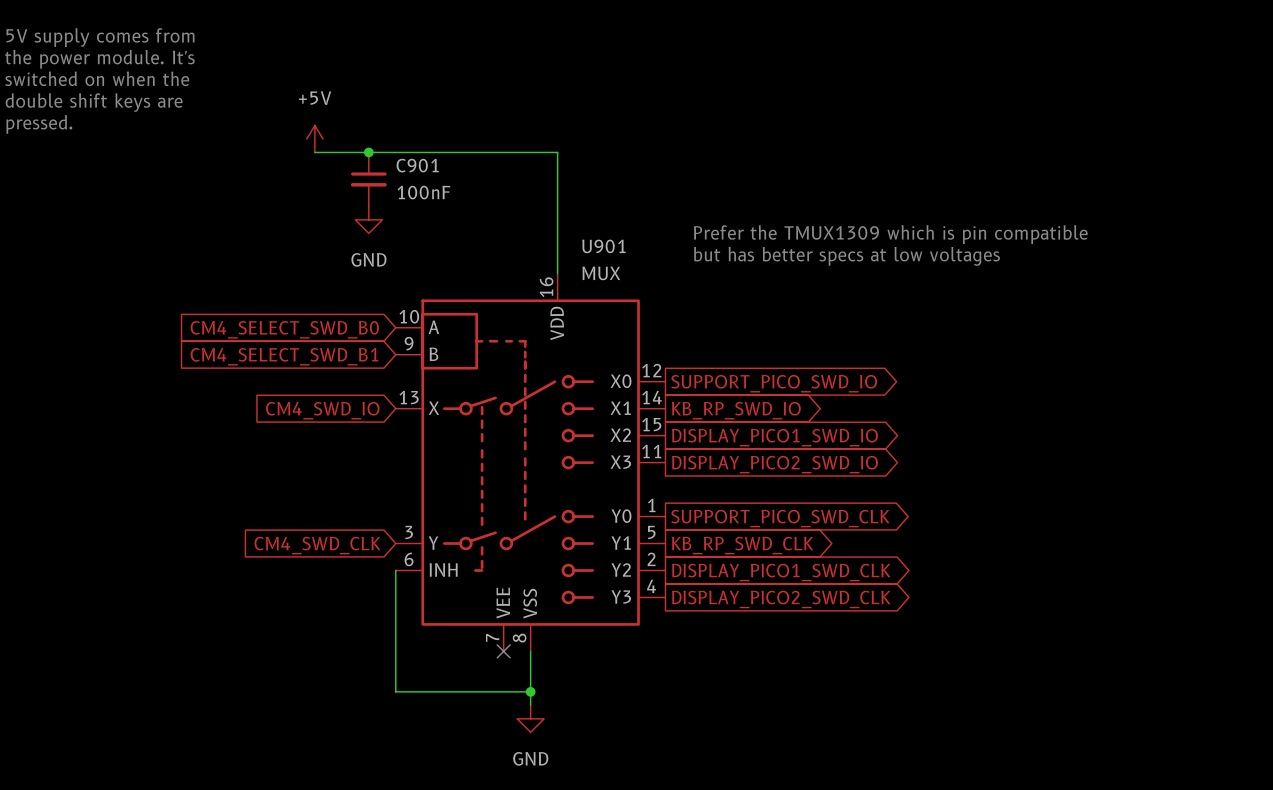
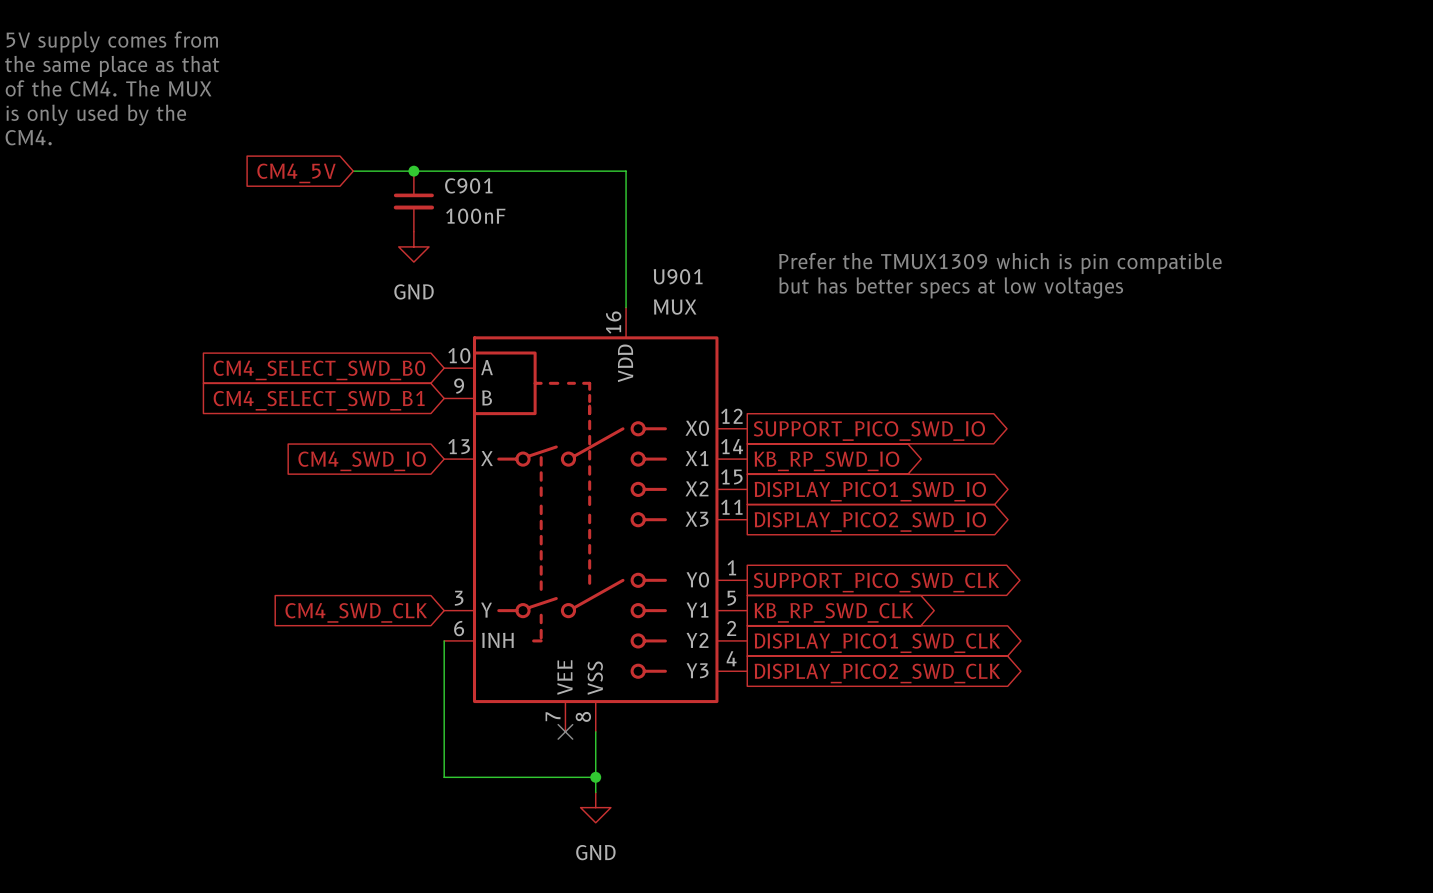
text: the power module. It's (99, 59) -> the same place as that (112, 66)
text: switched on when the (97, 78) -> of the CM4. The MUX (108, 88)
text: double shift keys are (94, 102) -> is only used by the (96, 115)
text: pressed. (39, 124) -> CM4. (28, 137)
power symbol: +5V (314, 138) -> none
global label: none -> CM4_5V (296, 173)

